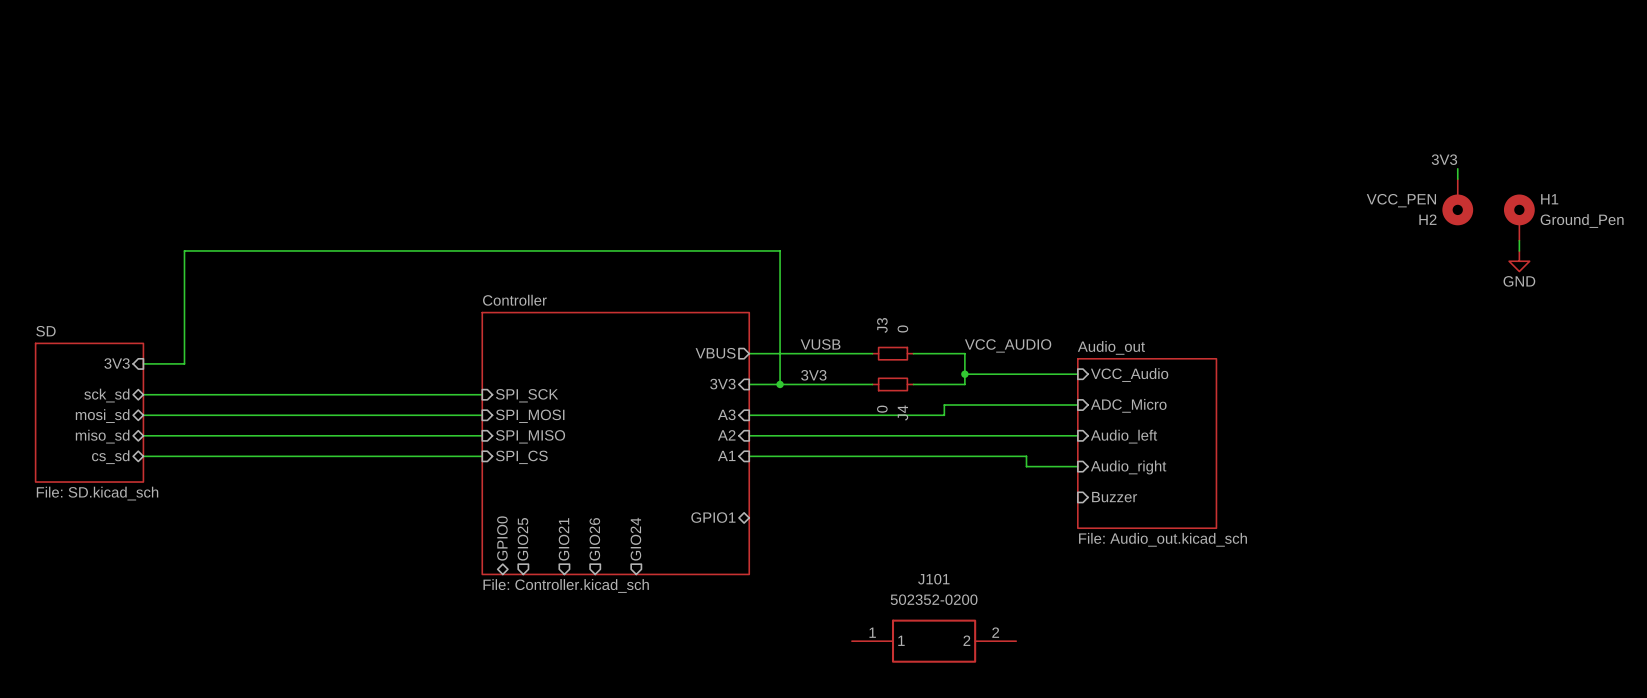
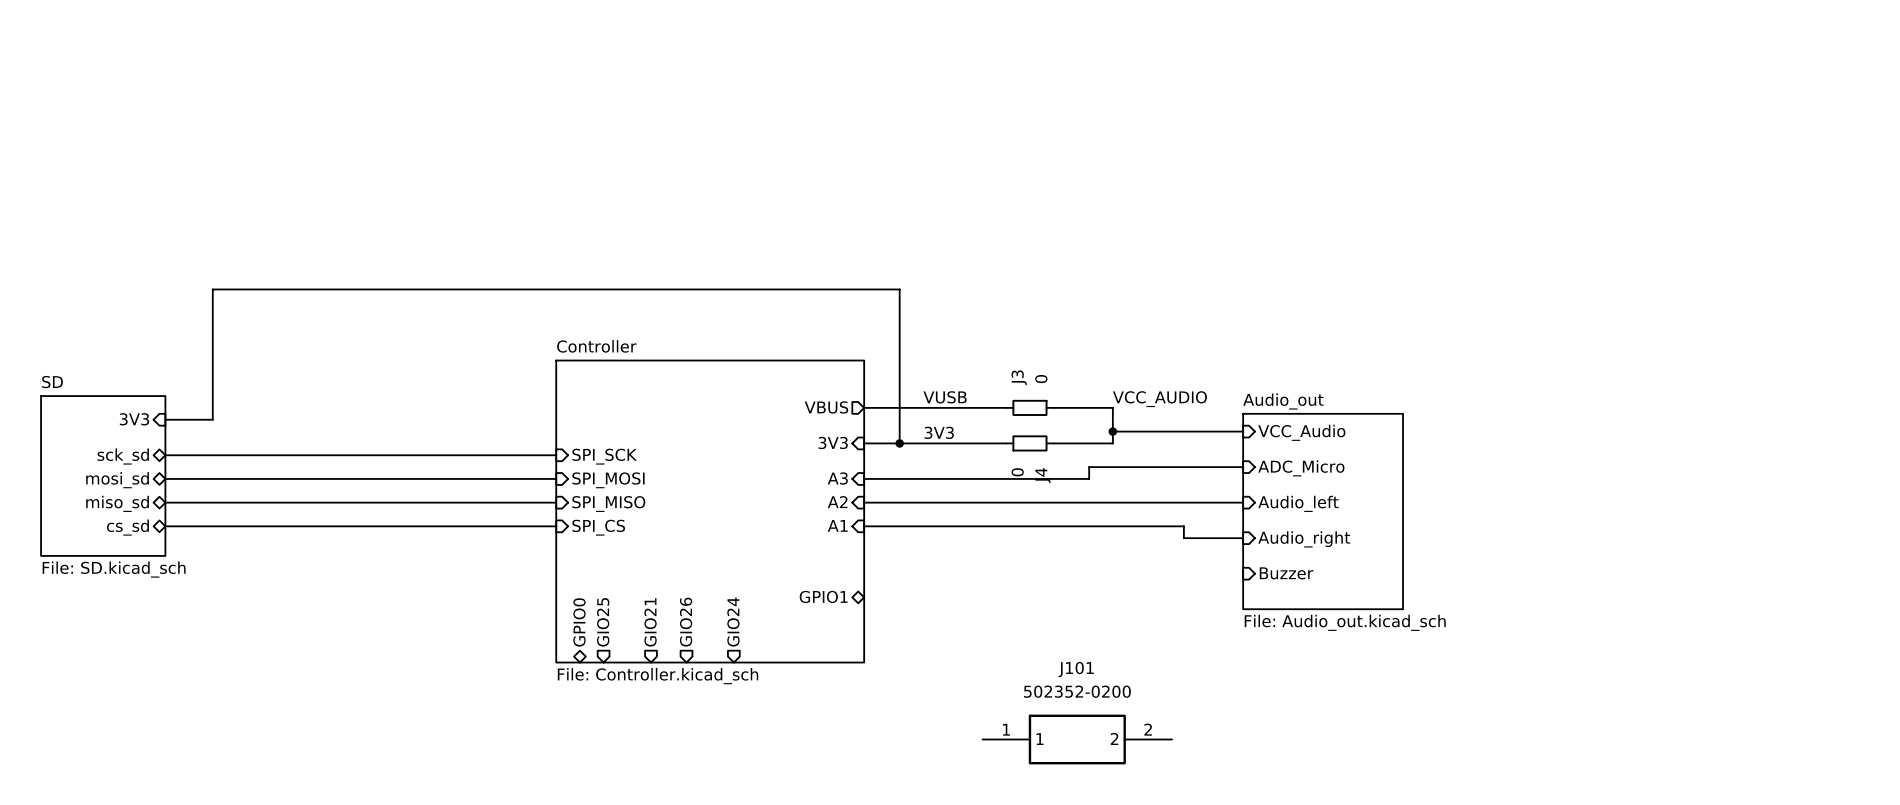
label: 3V3 (1444, 159) -> none
wire: (1457, 168) (1457, 179) -> none
H2: VCC_PEN (1457, 202) -> none
H1: Ground_Pen (1519, 217) -> none
wire: (1519, 240) (1519, 250) -> none
power symbol: GND (1519, 261) -> none

